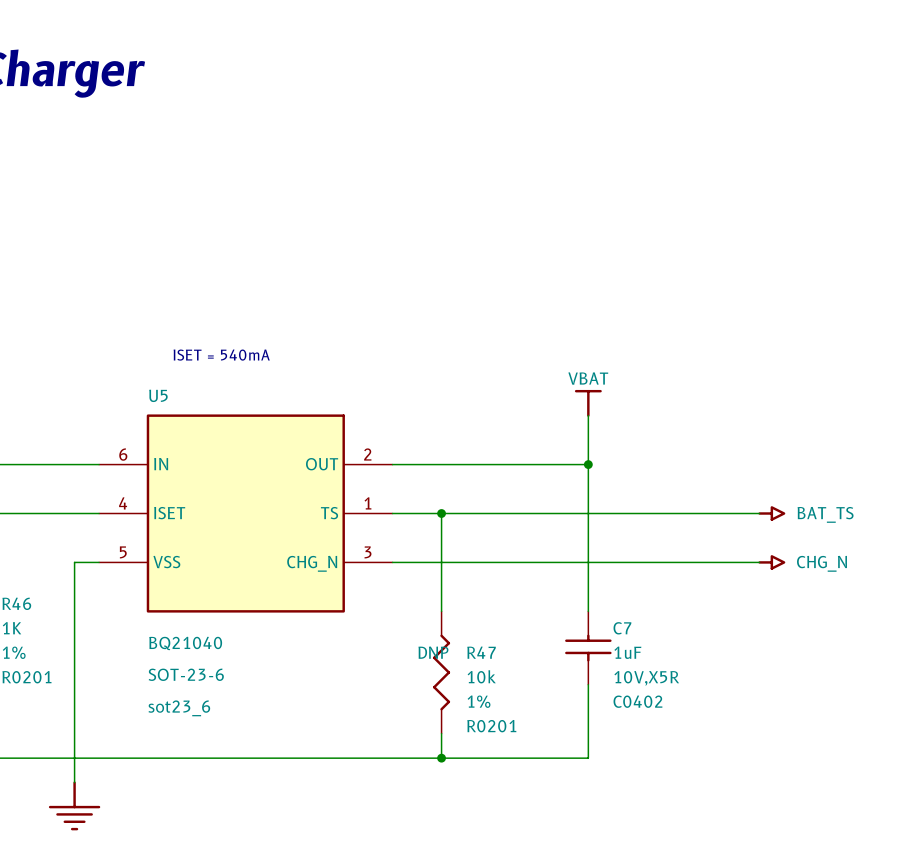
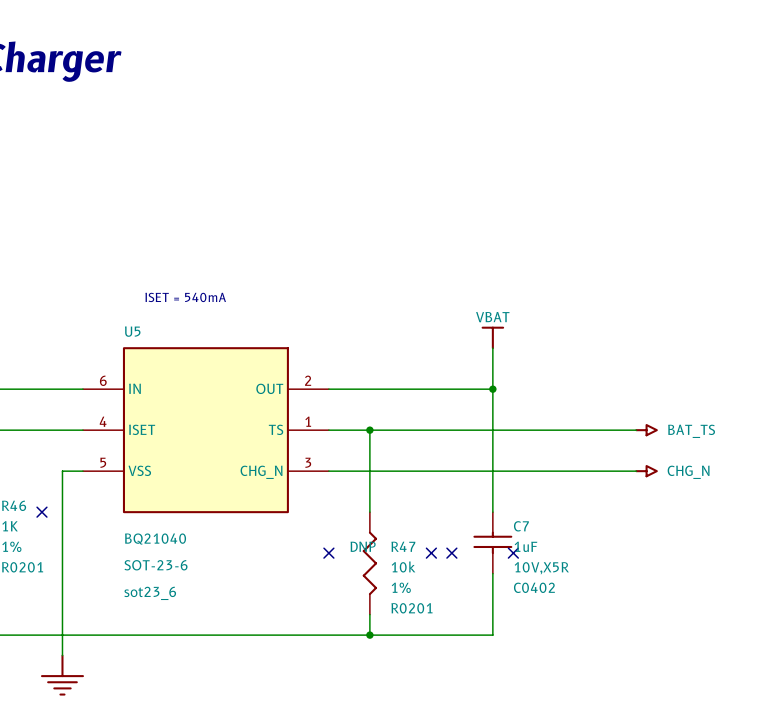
no-connect mark: none -> (41, 512)
no-connect mark: none -> (328, 553)
no-connect mark: none -> (431, 553)
no-connect mark: none -> (451, 553)
no-connect mark: none -> (513, 553)

